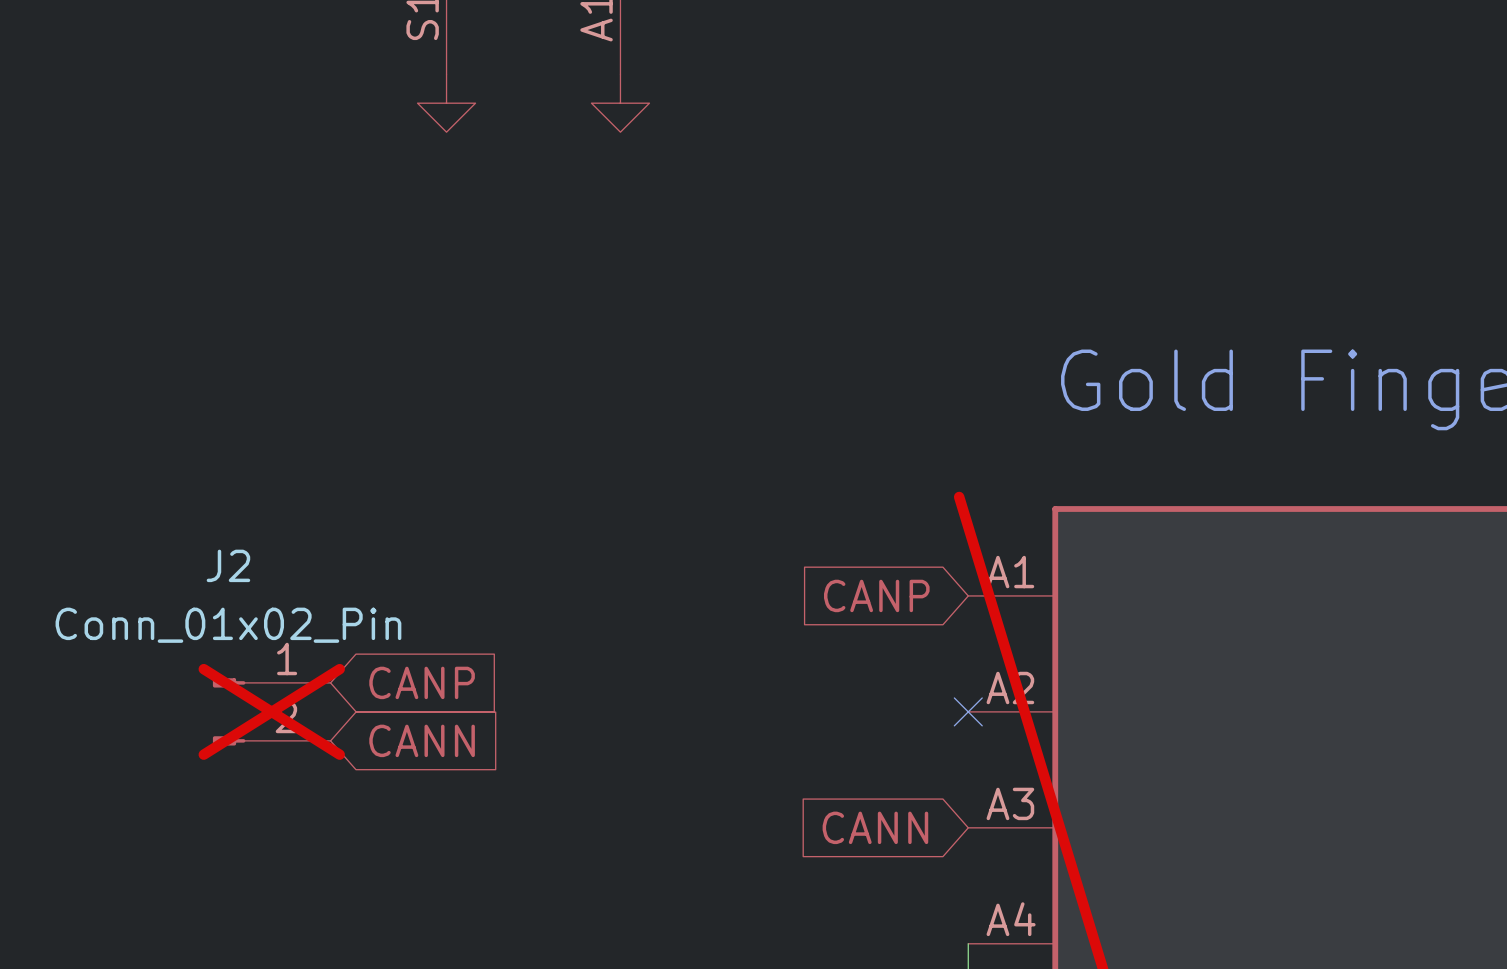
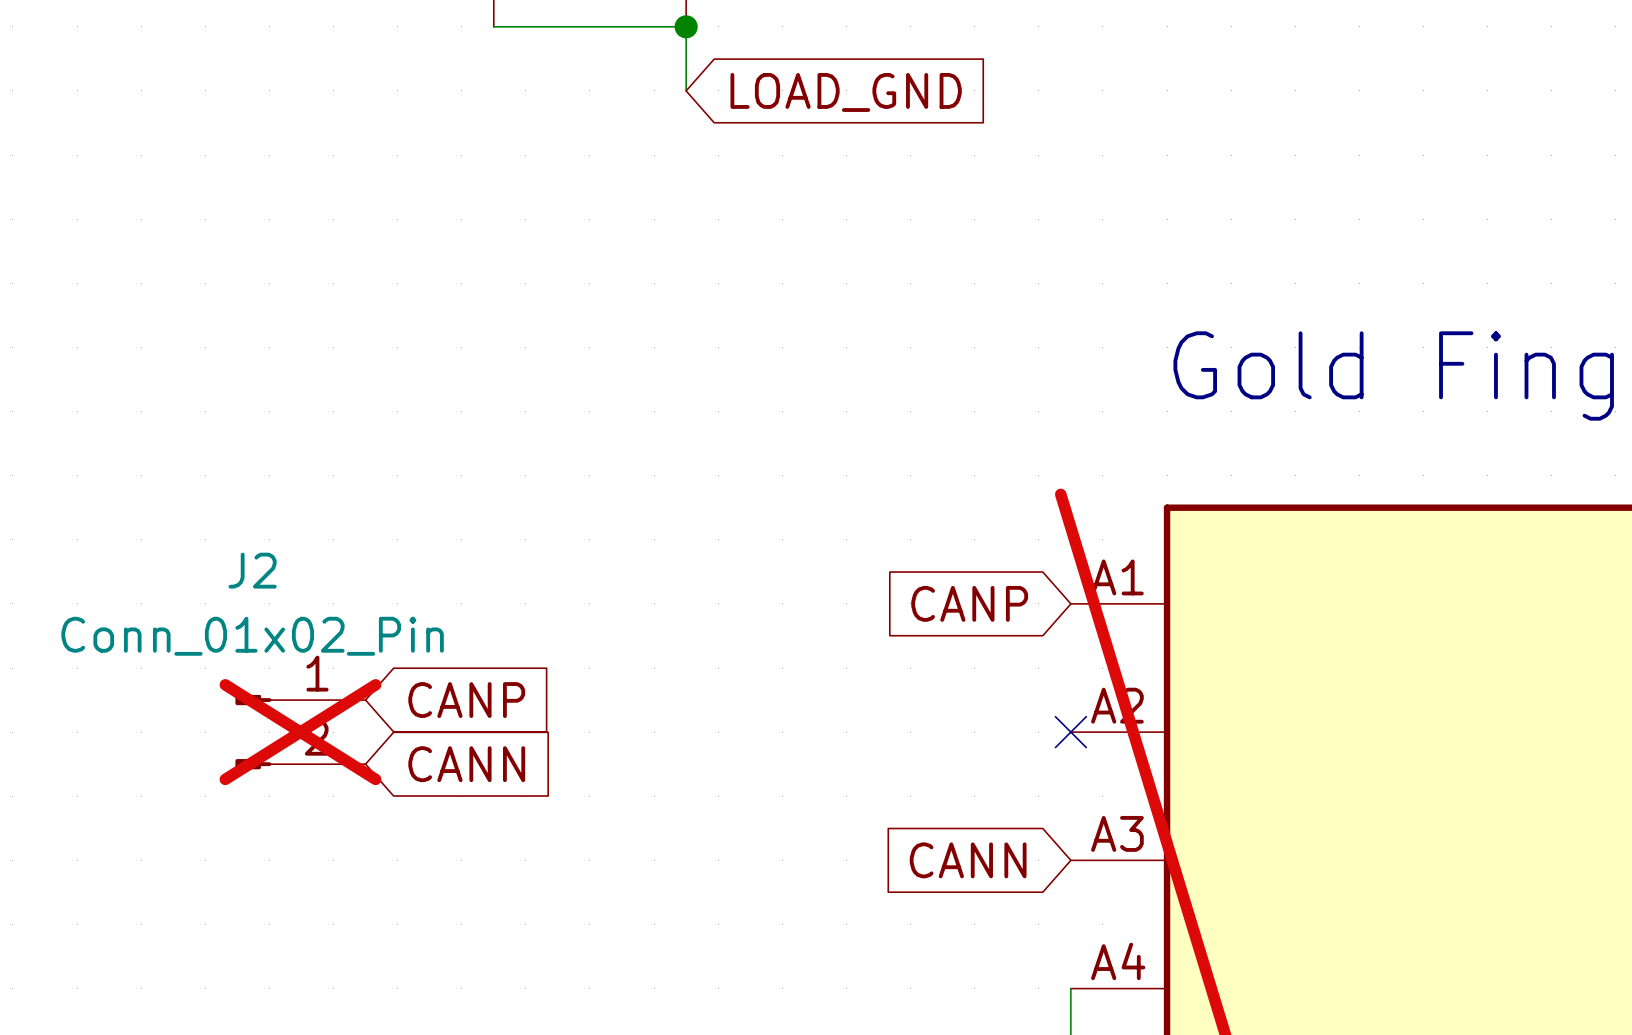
wire: none -> (493, 26) (686, 26) (686, 90)
junction: none -> (686, 26)
power symbol: (446, 103) -> none
power symbol: (620, 103) -> none
global label: none -> LOAD_GND (846, 92)

